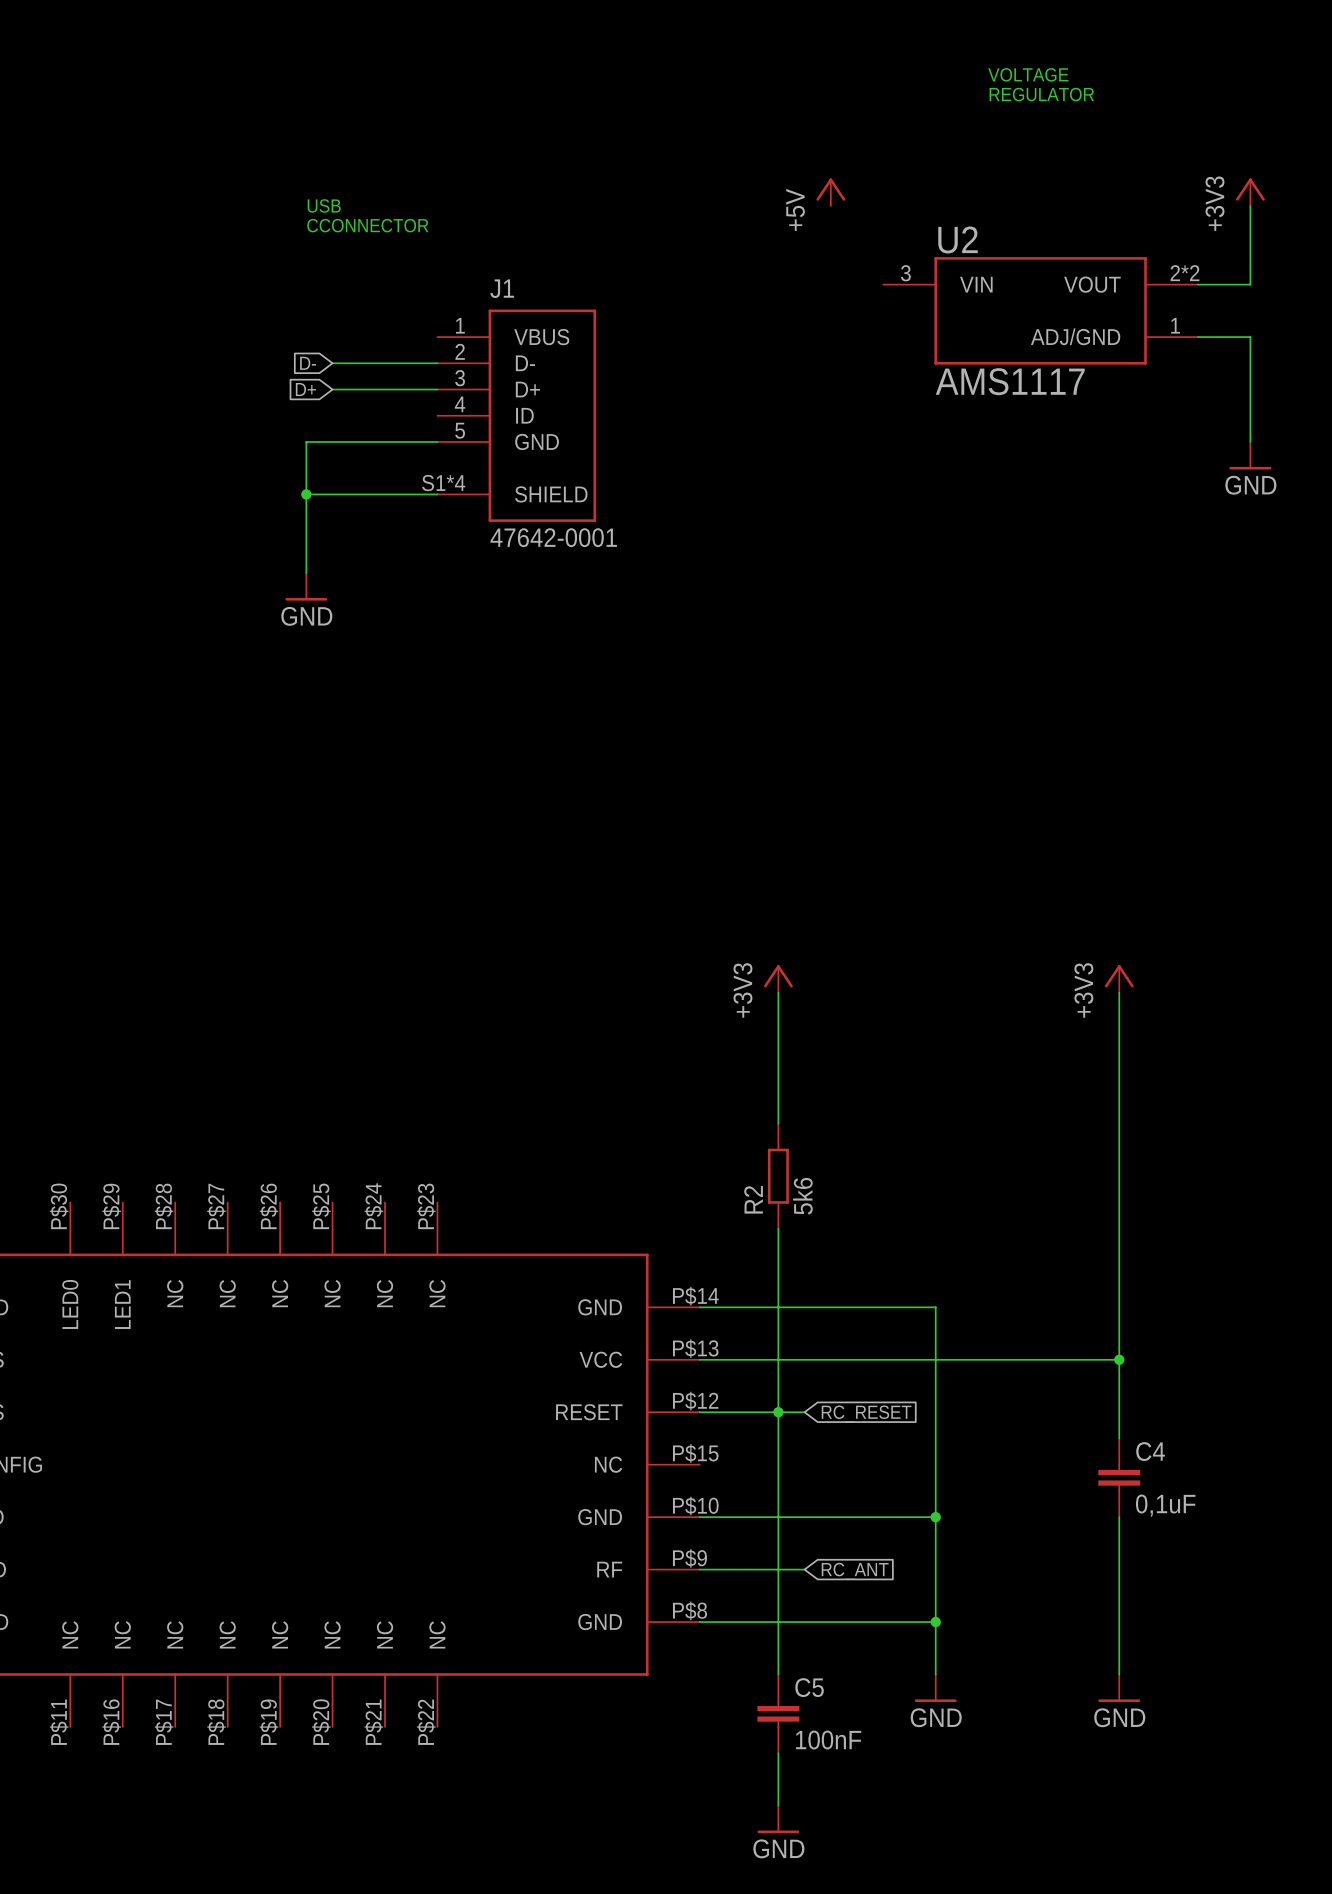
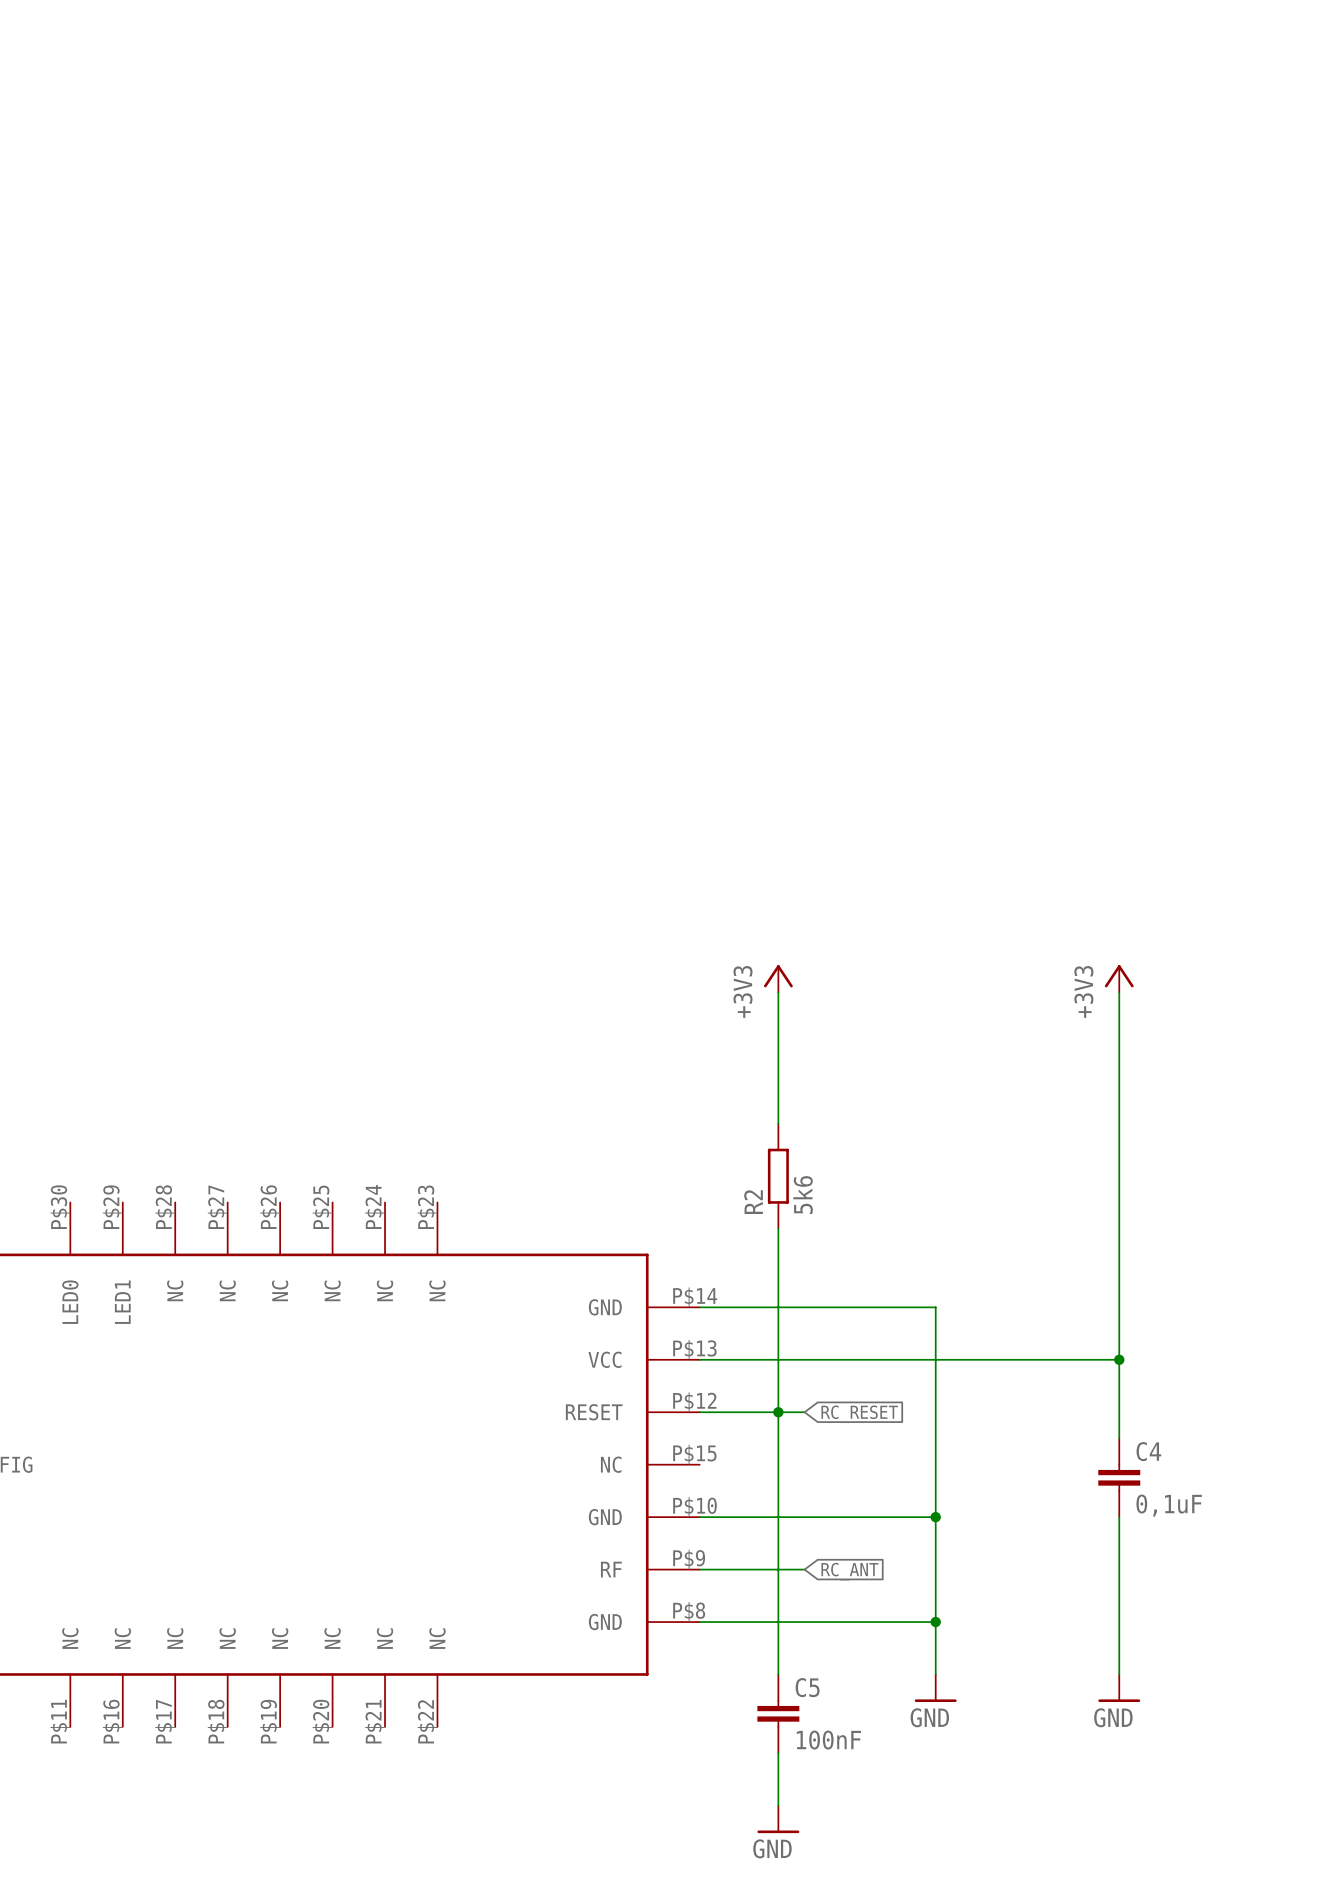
text: VOLTAGE (1028, 74) -> none
text: REGULATOR (1041, 94) -> none
power symbol: +5V (830, 192) -> none
power symbol: +3V3 (1250, 192) -> none
text: USB (324, 205) -> none
wire: (1250, 205) (1250, 284) (1197, 284) -> none
text: CCONNECTOR (367, 225) -> none
U2: AMS1117 (1040, 310) -> none
wire: (1197, 337) (1250, 337) (1250, 441) -> none
global label: D- (308, 363) -> none
wire: (332, 363) (437, 363) -> none
global label: D+ (305, 389) -> none
wire: (332, 389) (437, 389) -> none
J1: 47642-0001 (516, 415) -> none
wire: (437, 441) (306, 441) (306, 573) -> none
power symbol: GND (1250, 455) -> none
wire: (306, 494) (437, 494) -> none
junction: (306, 494) -> none
power symbol: GND (306, 586) -> none

